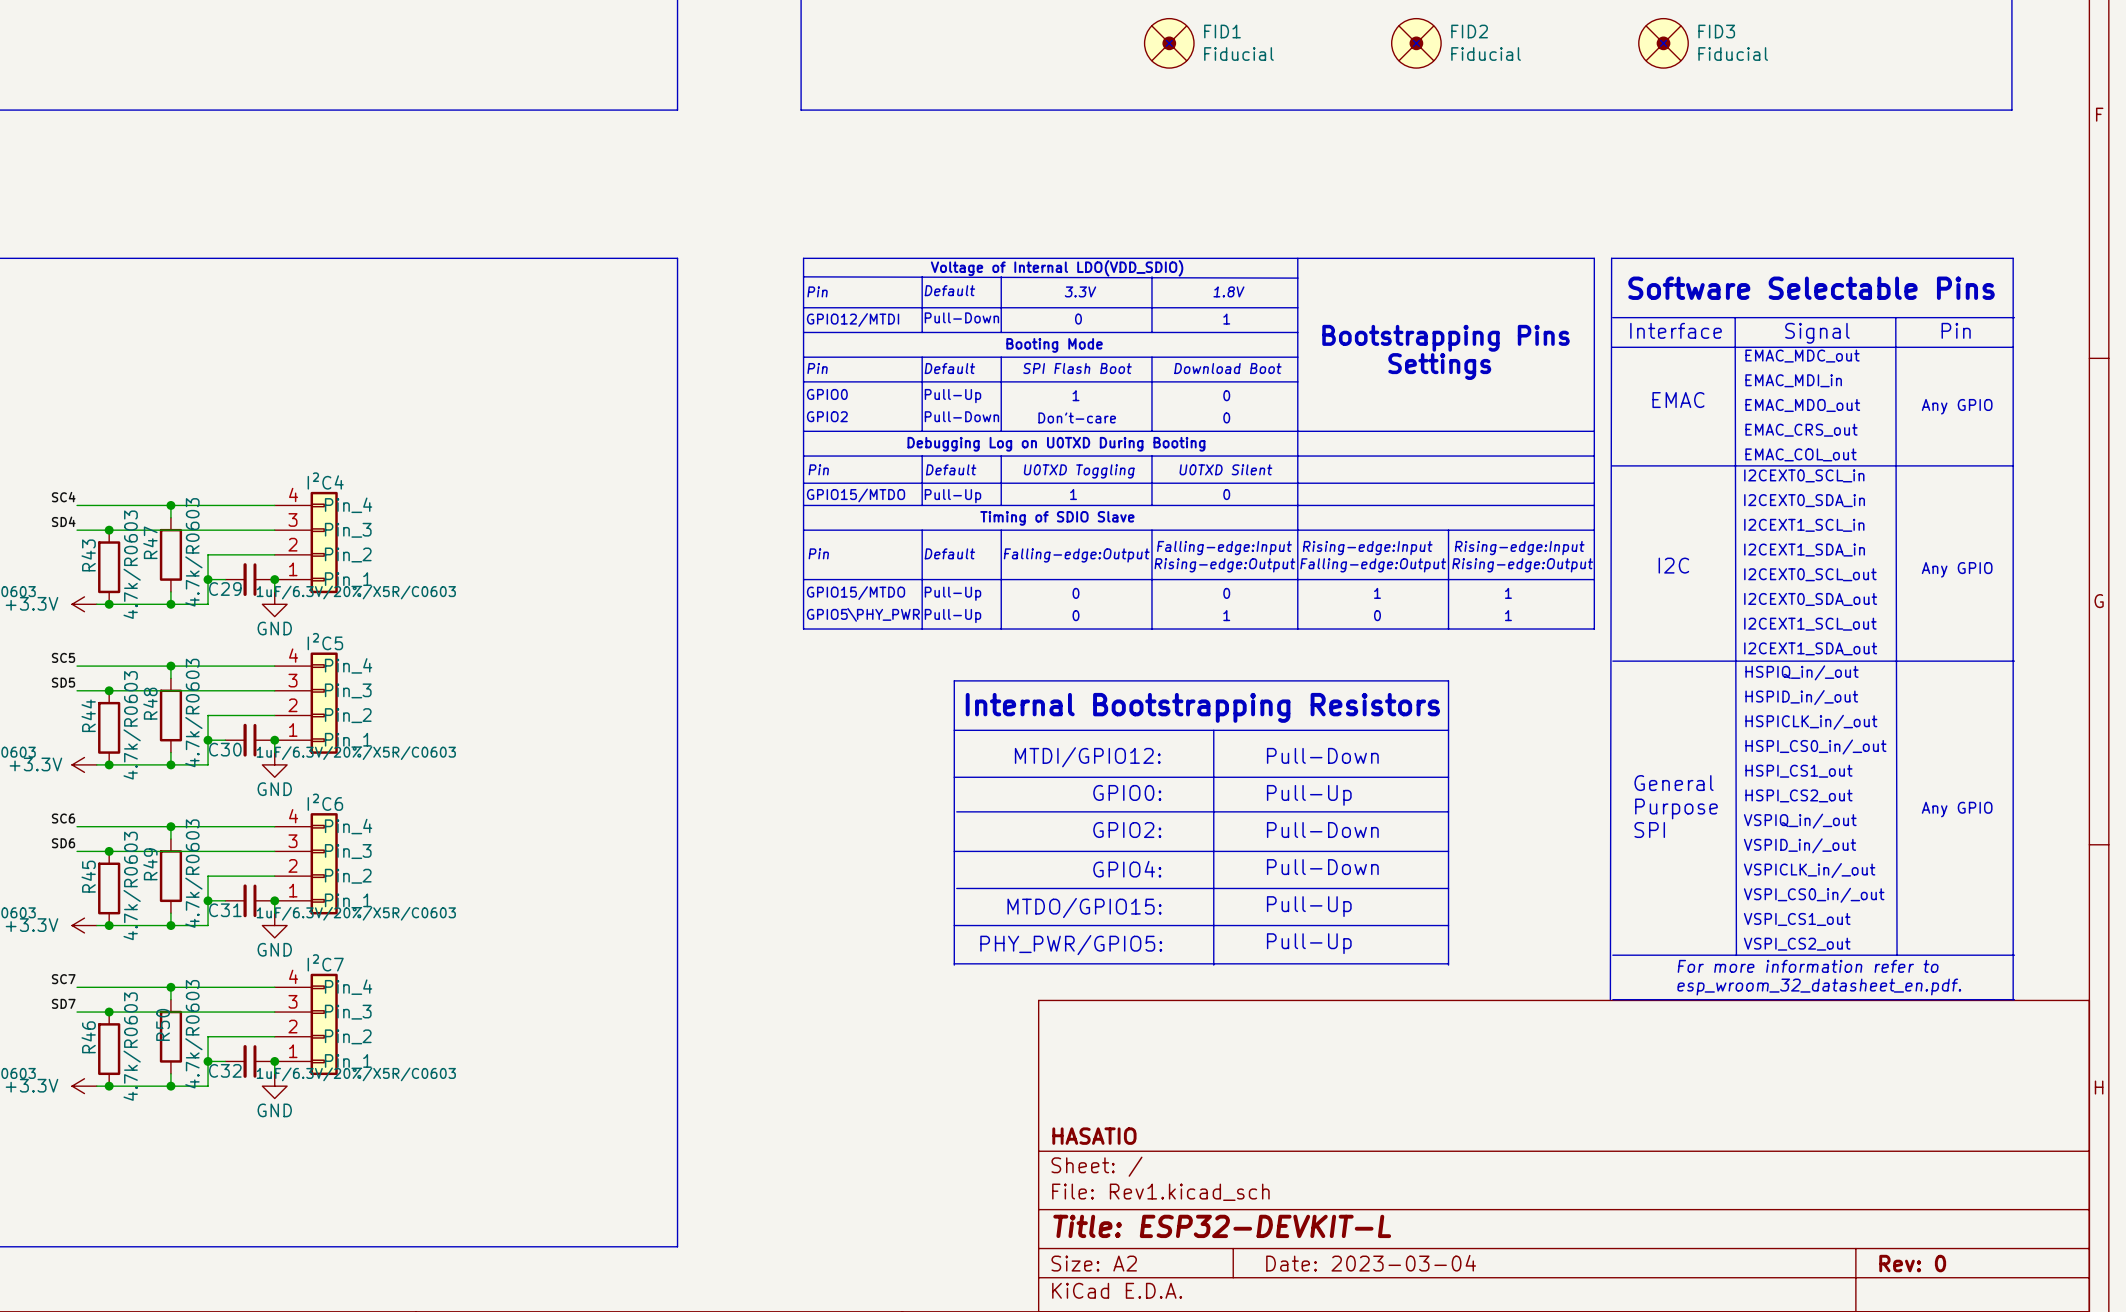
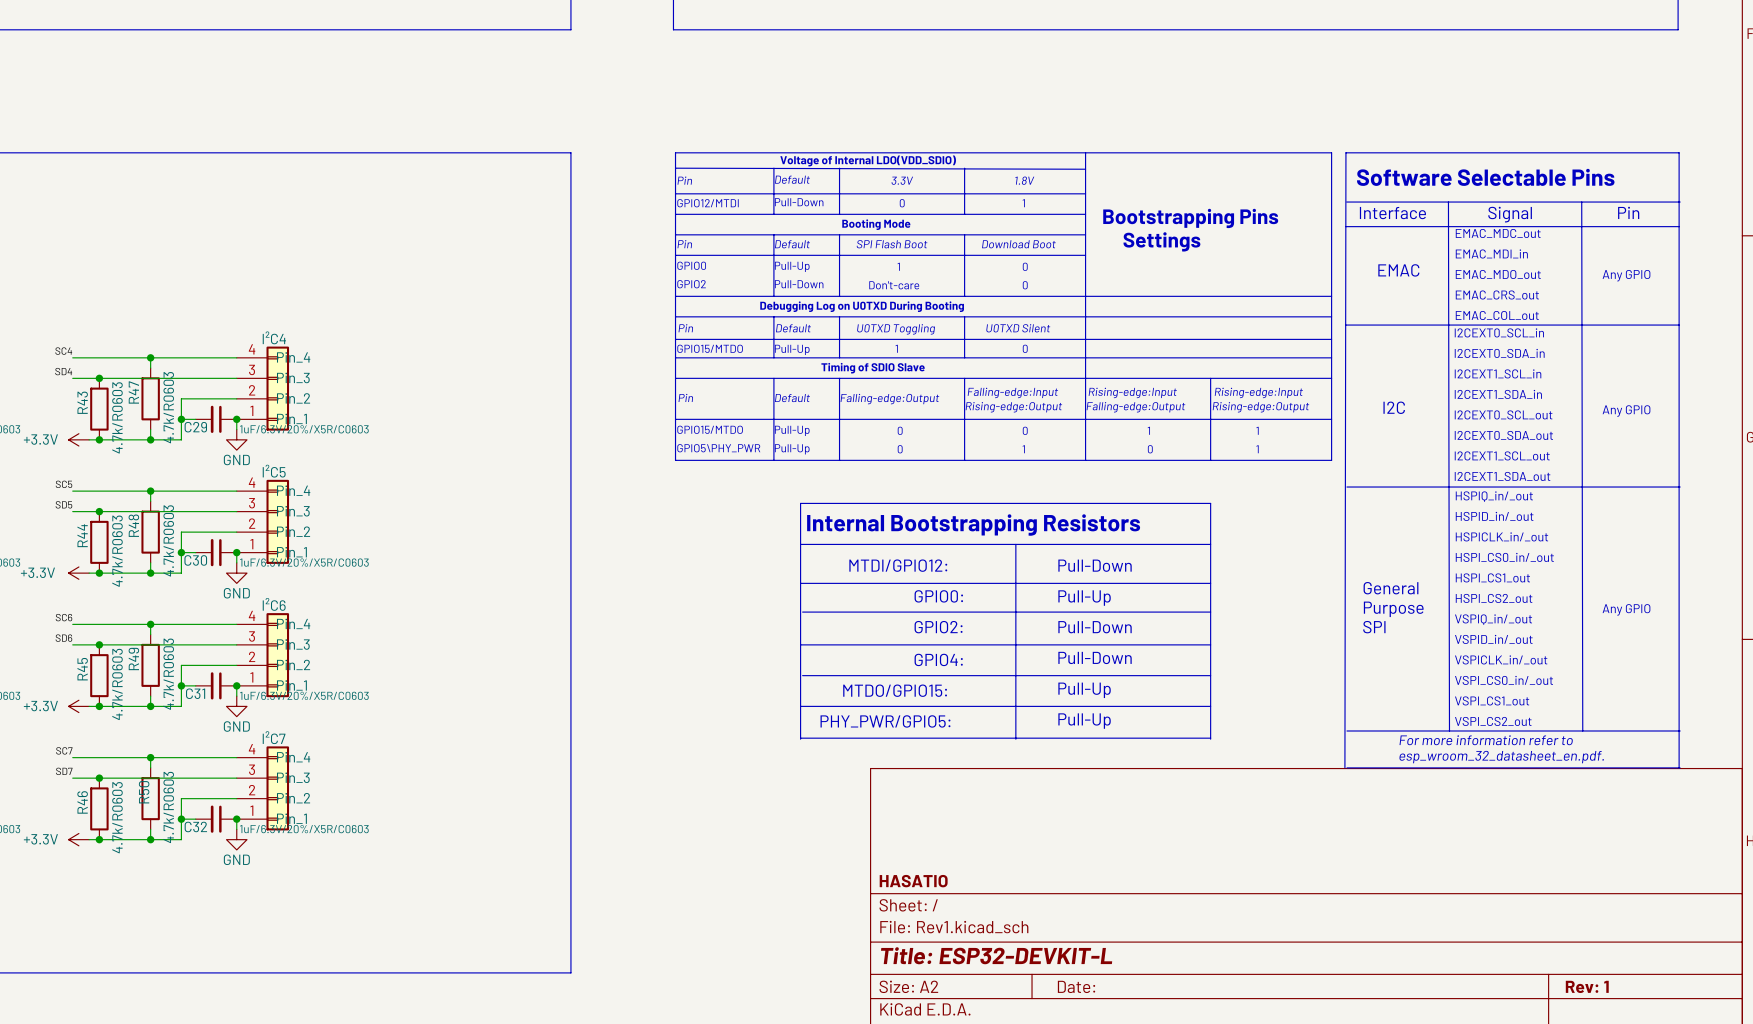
title block: Date: 2023-03-04 (1371, 1263) -> Date: (1076, 986)
title block: Rev: 0 (1912, 1263) -> Rev: 1 (1587, 986)

